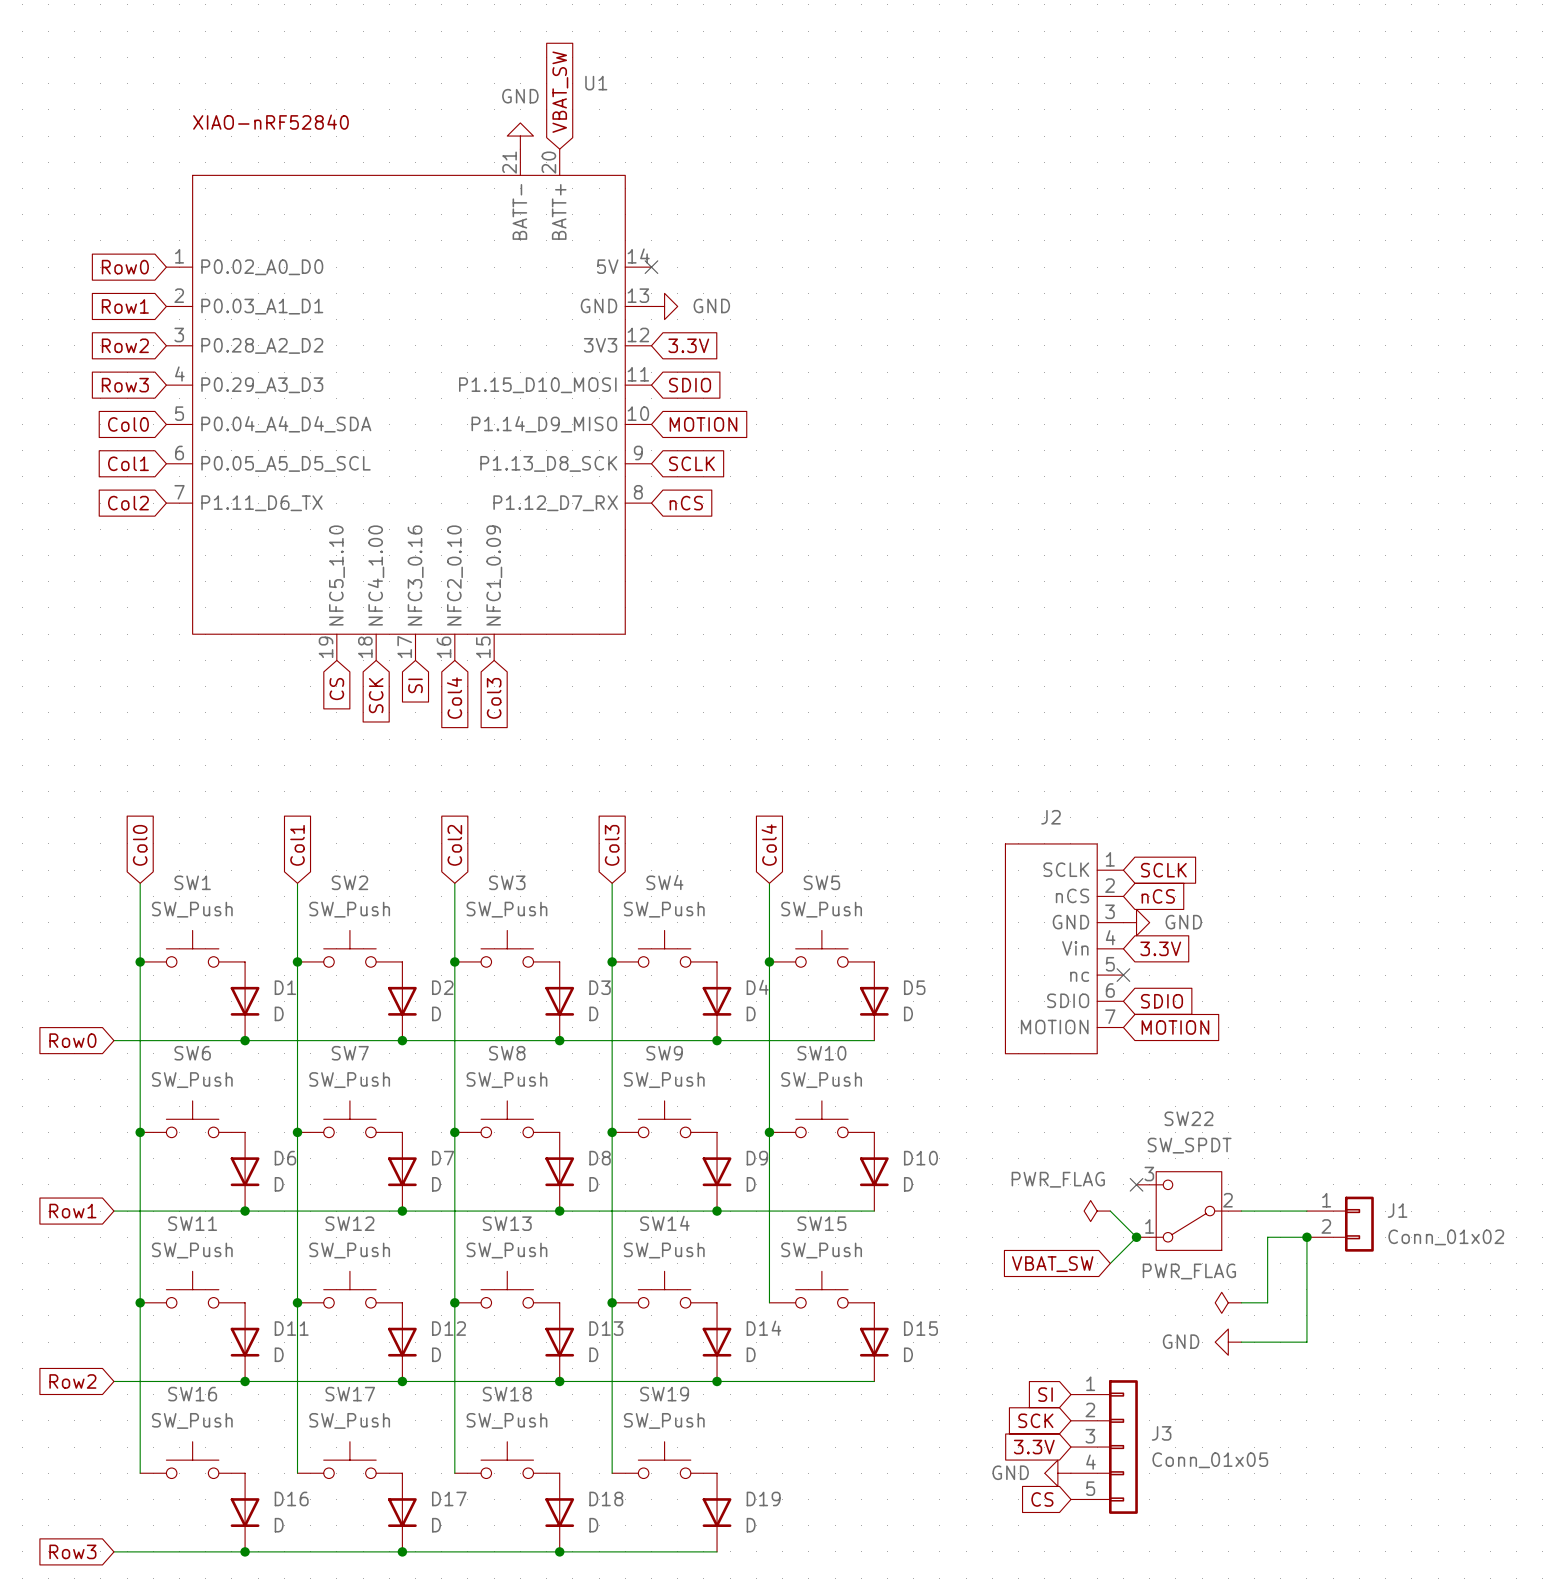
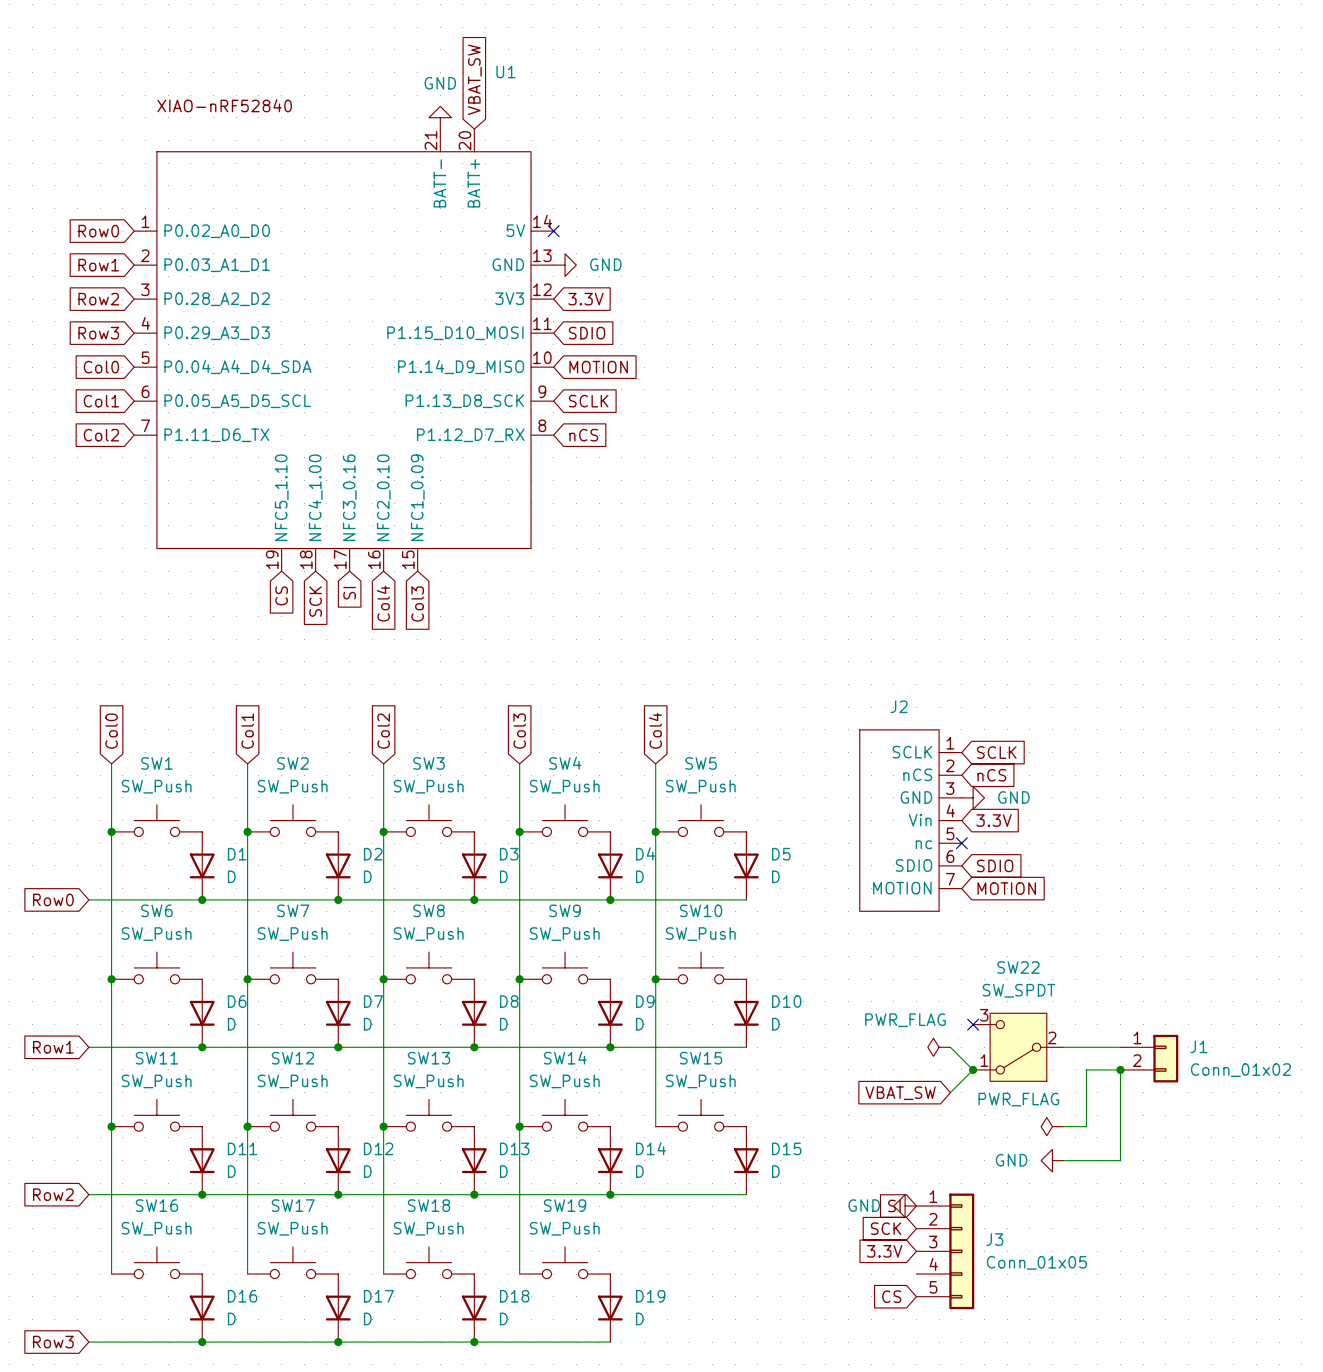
power symbol position: GND (1057, 1473) -> GND (905, 1206)

